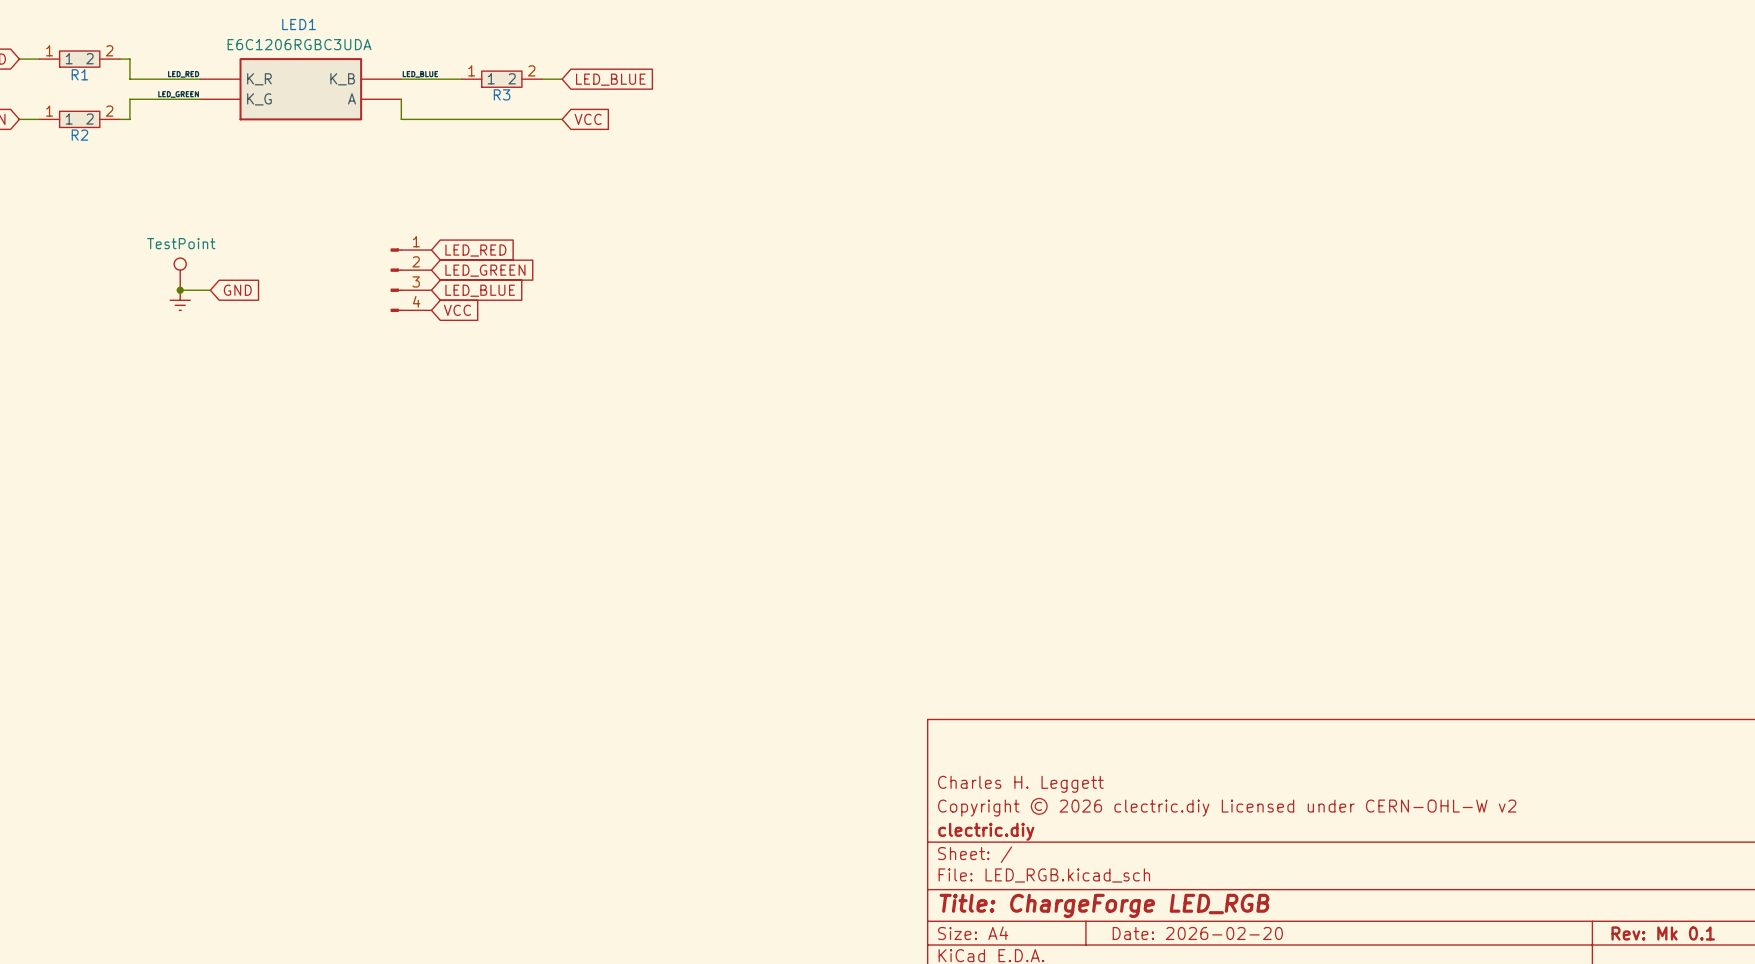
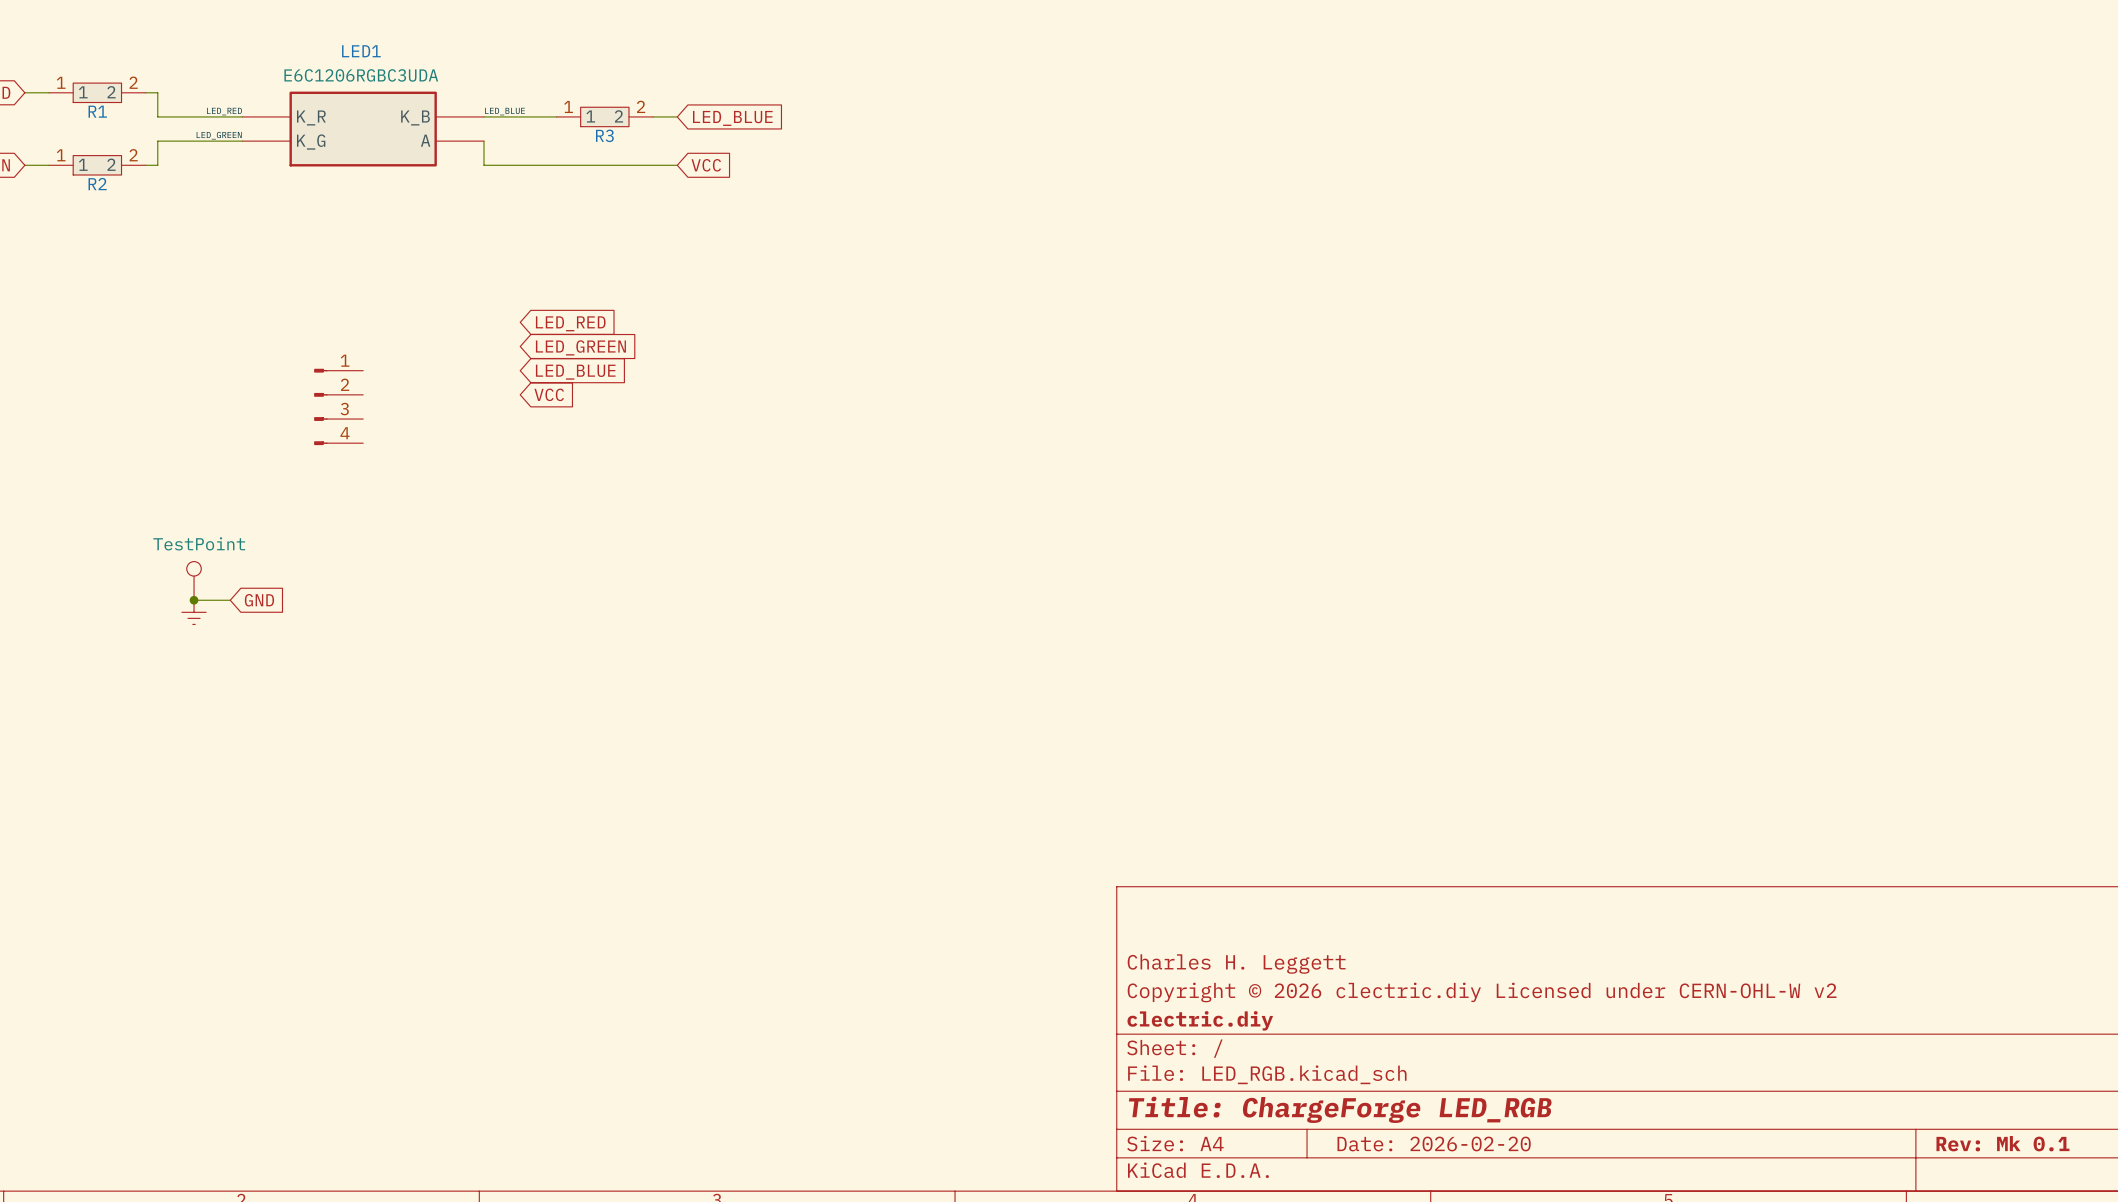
part position: (180, 274) -> (194, 580)
part position: (411, 280) -> (338, 406)
wire: (180, 290) (210, 290) -> (194, 600) (230, 600)
junction: (180, 290) -> none
global label position: GND (237, 290) -> GND (259, 600)
power symbol position: (180, 300) -> (194, 612)
junction: none -> (194, 600)

